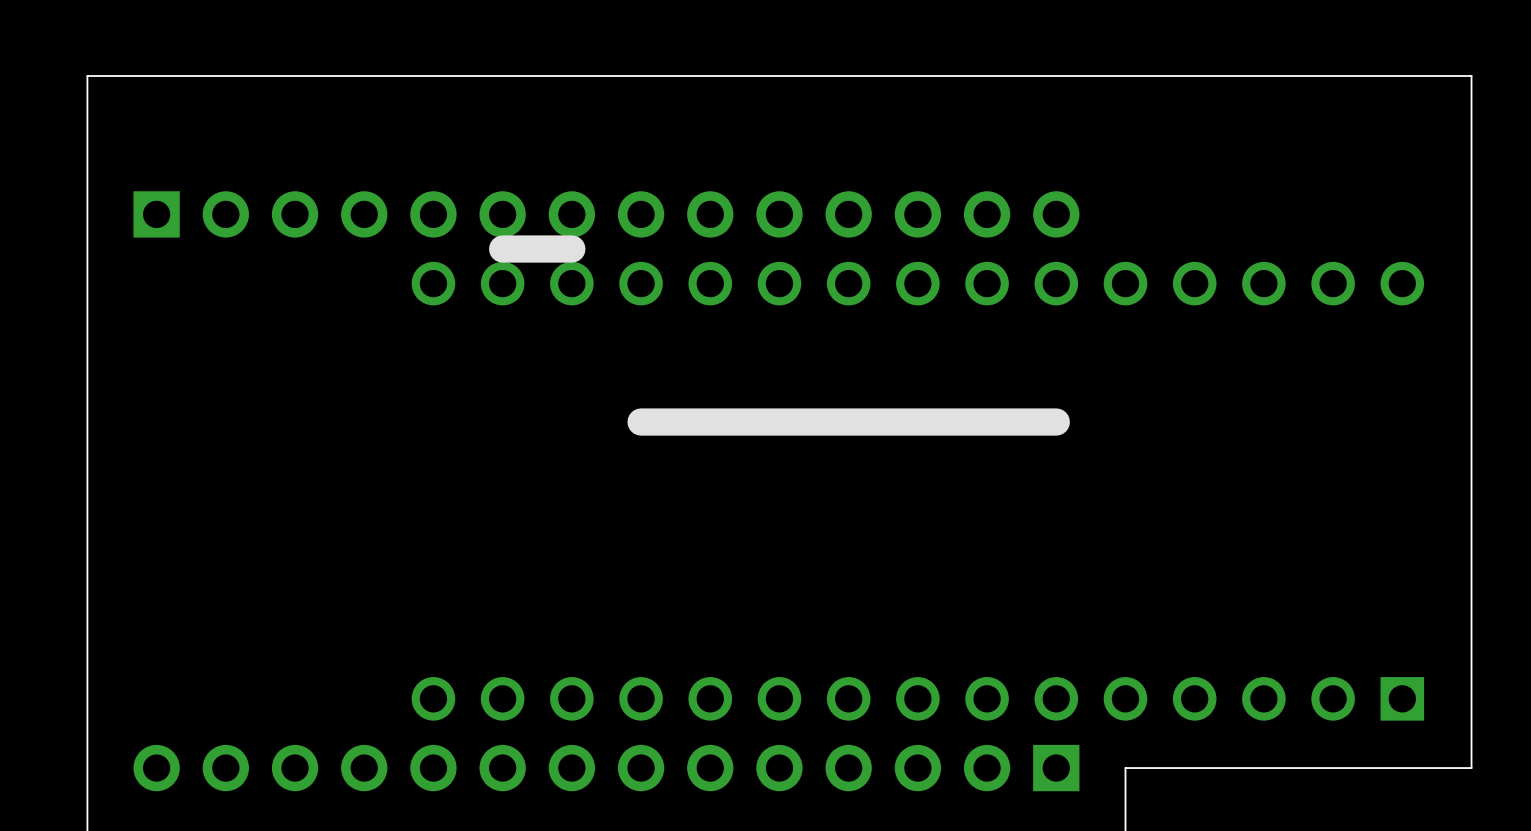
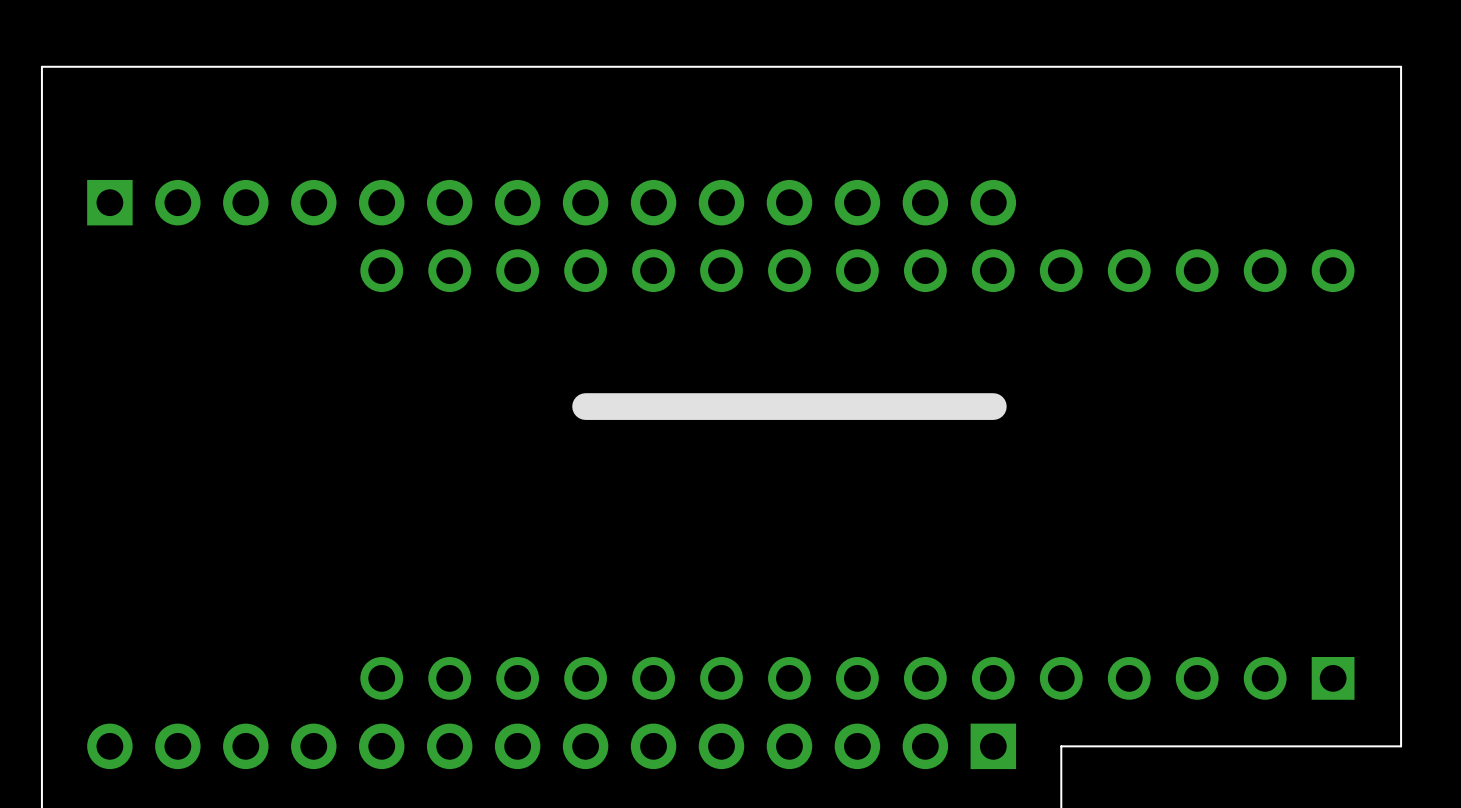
line: (571, 249) (502, 249) -> none

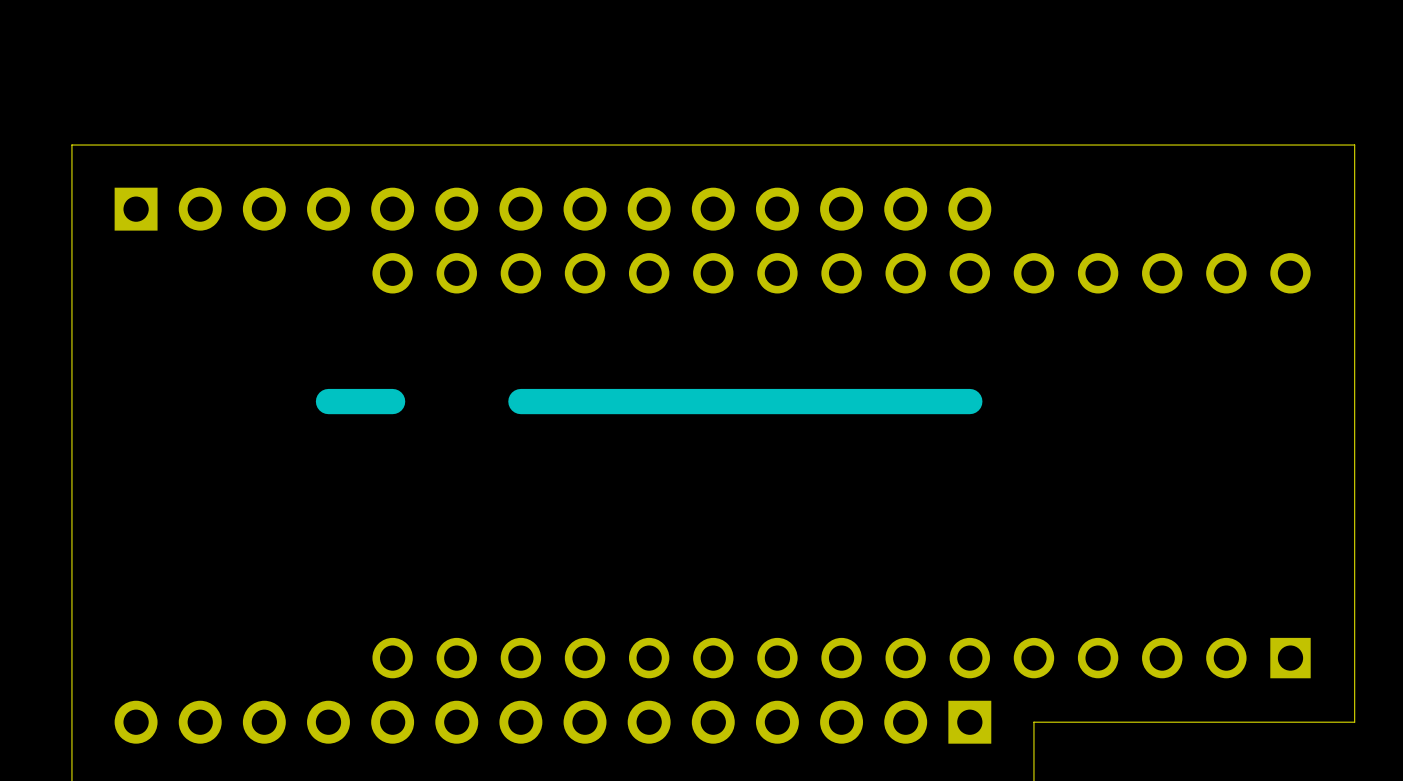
board edge: (1401, 134) (1401, 66) (41, 66) (41, 134) -> (1354, 145) (71, 145)
line: none -> (392, 401) (328, 401)
line: none -> (585, 401) (520, 401)

